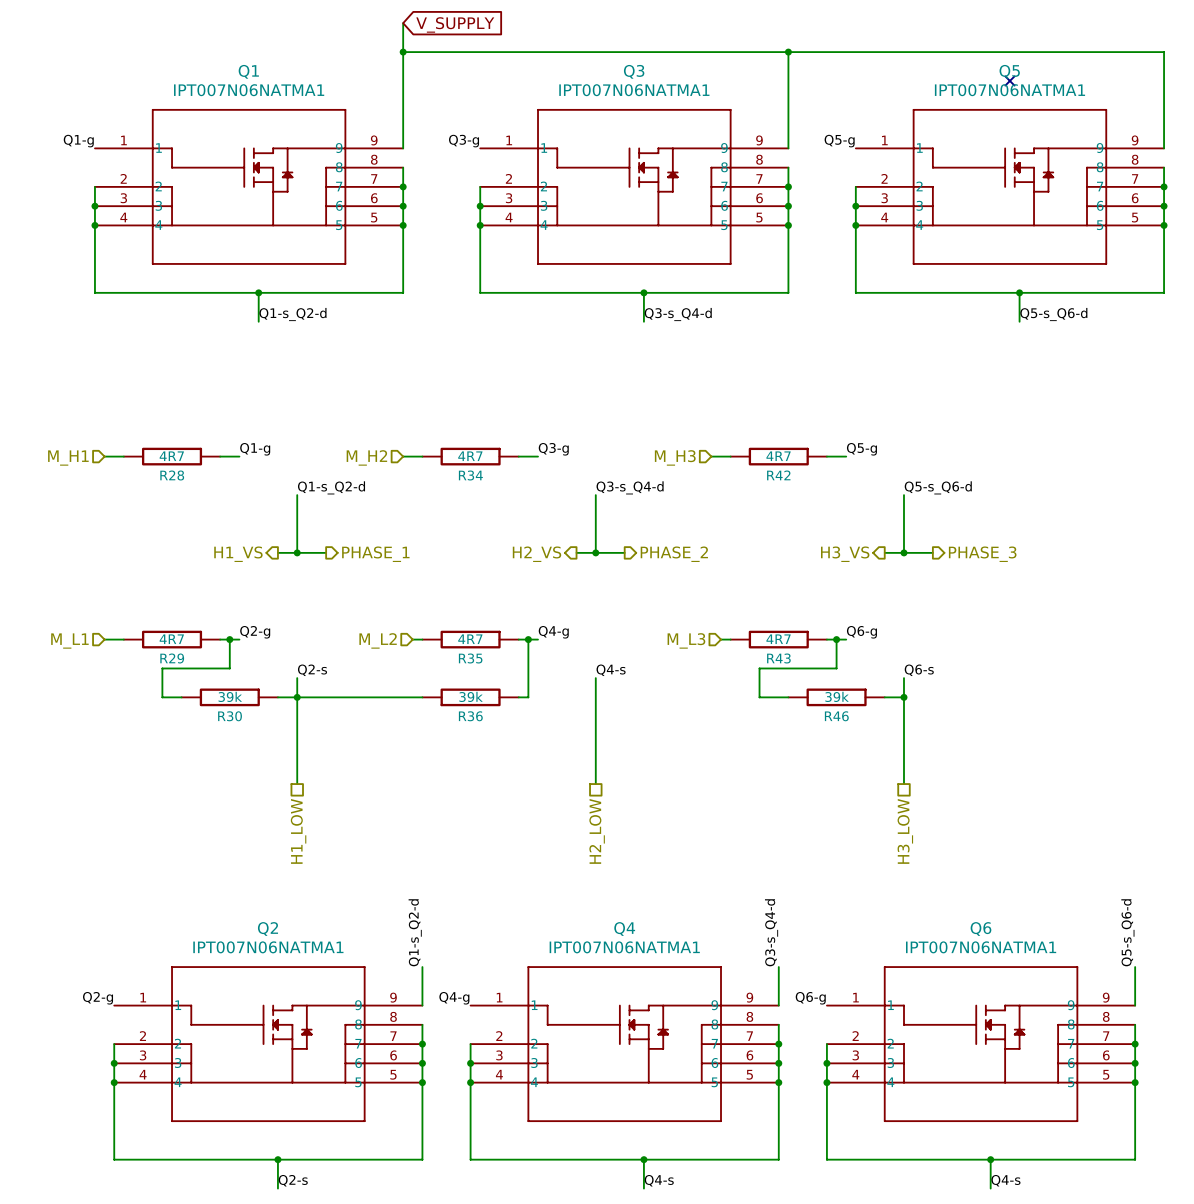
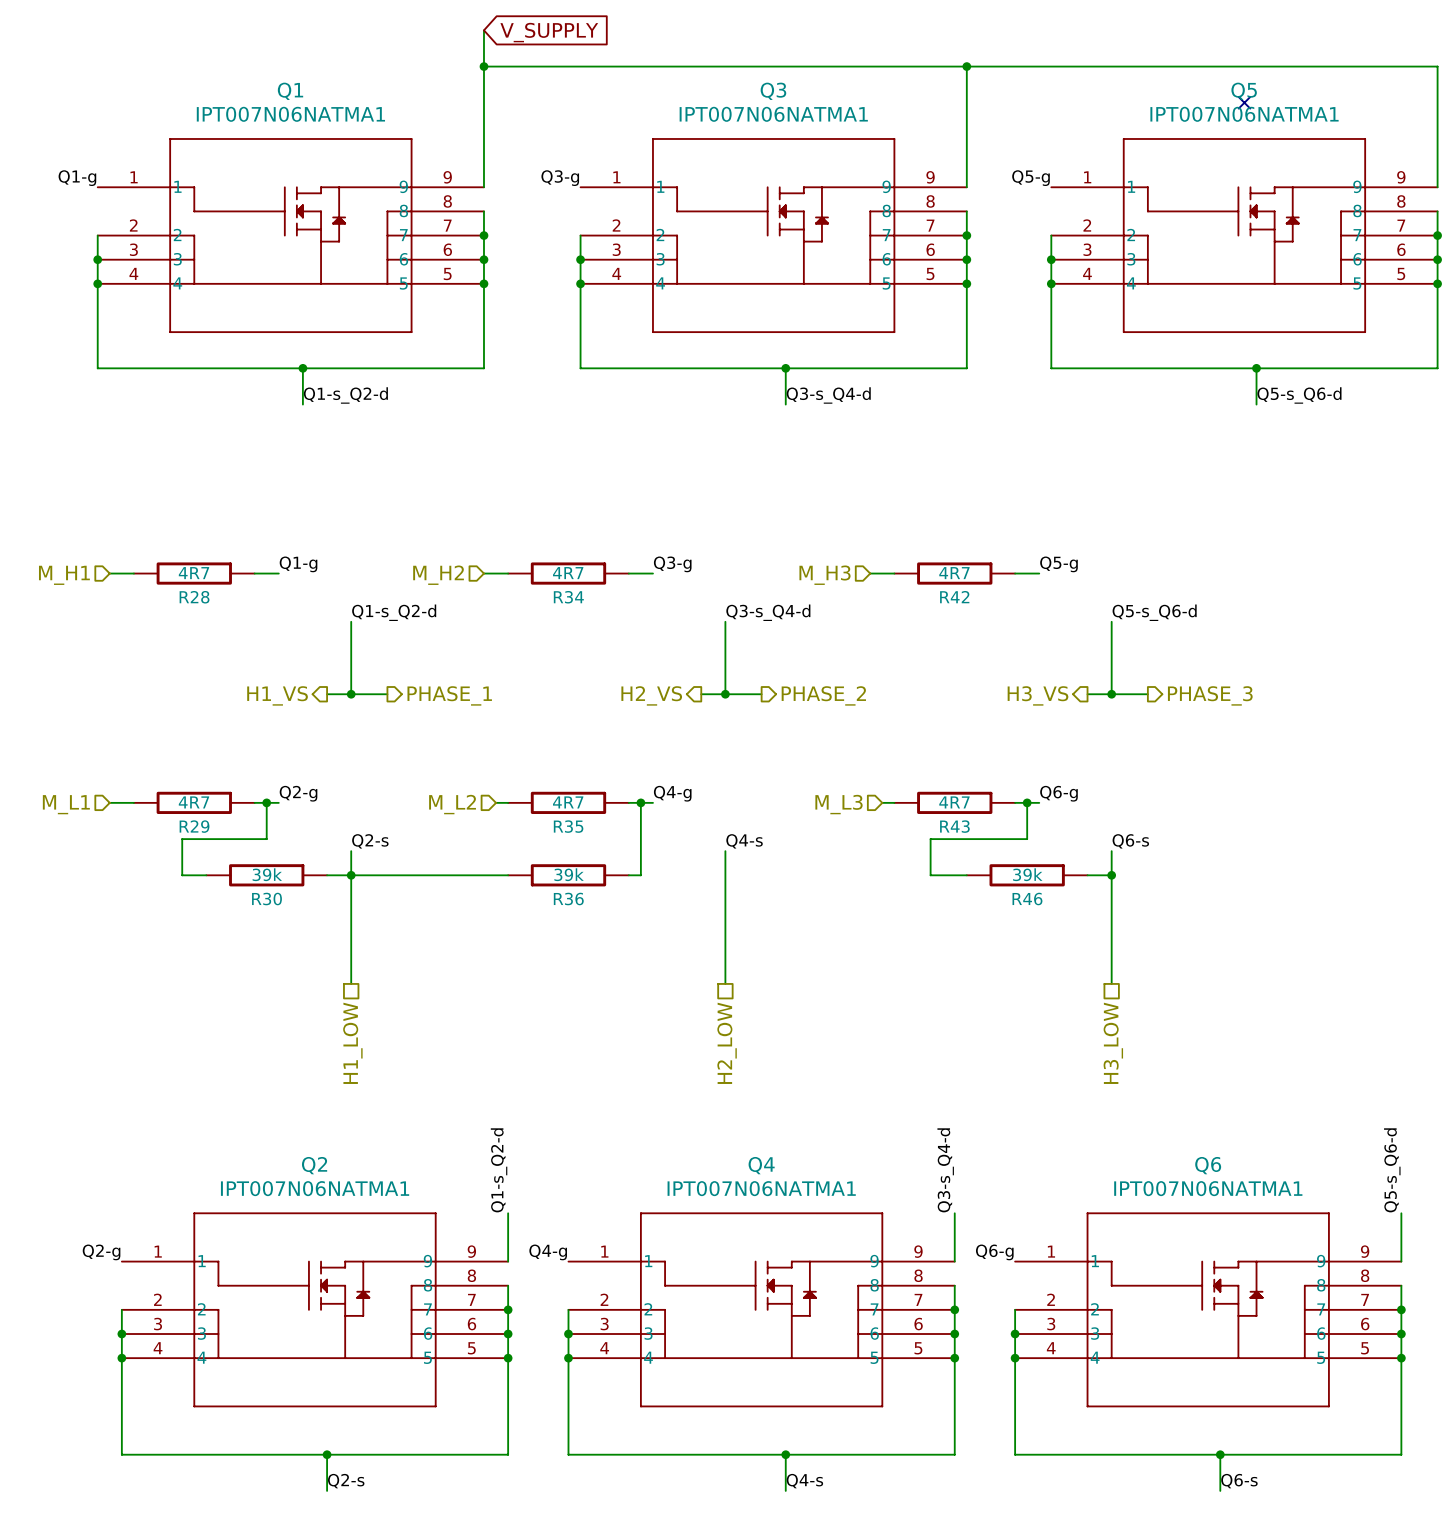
label: Q4-s (1005, 1180) -> Q6-s (1239, 1481)

